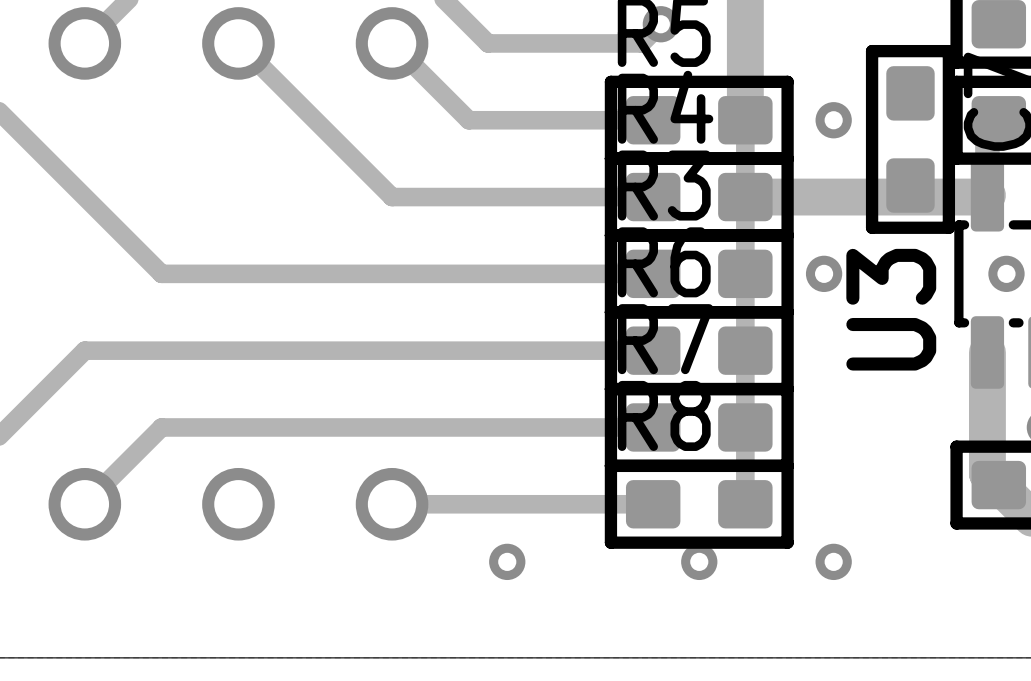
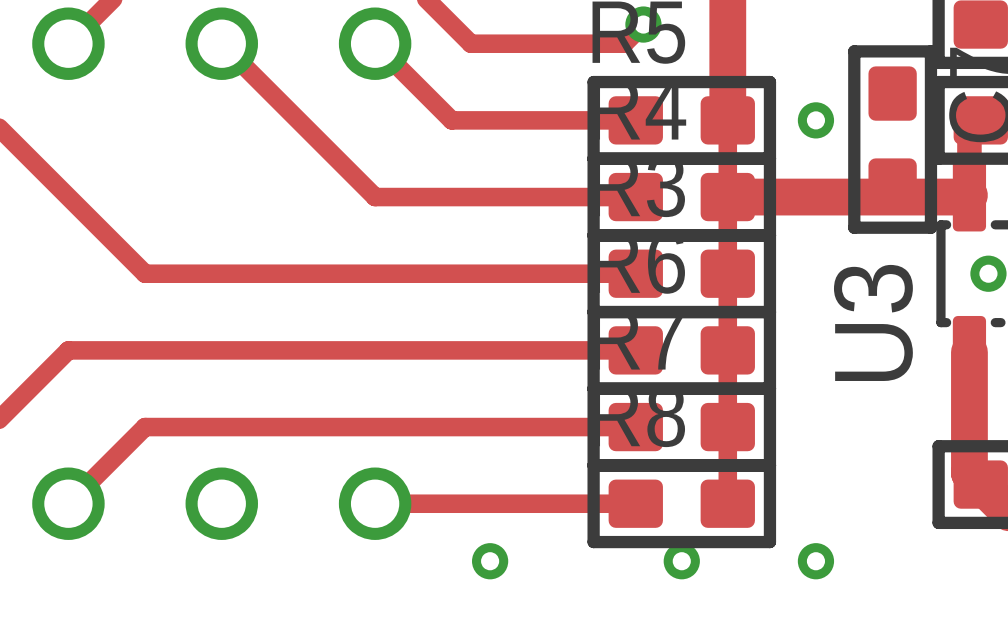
via: (824, 273) -> none

